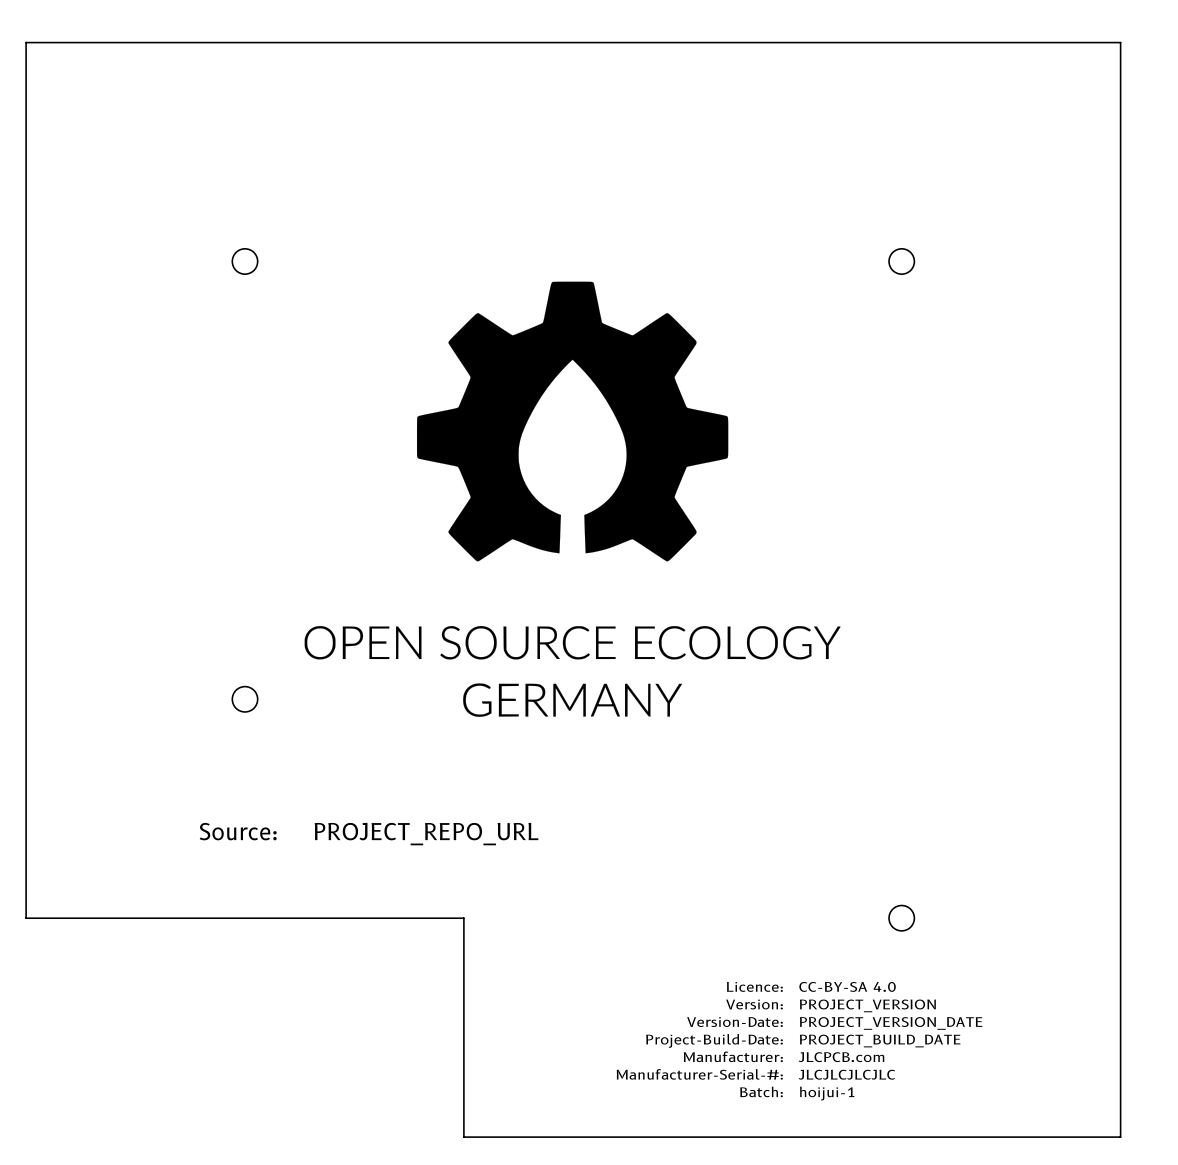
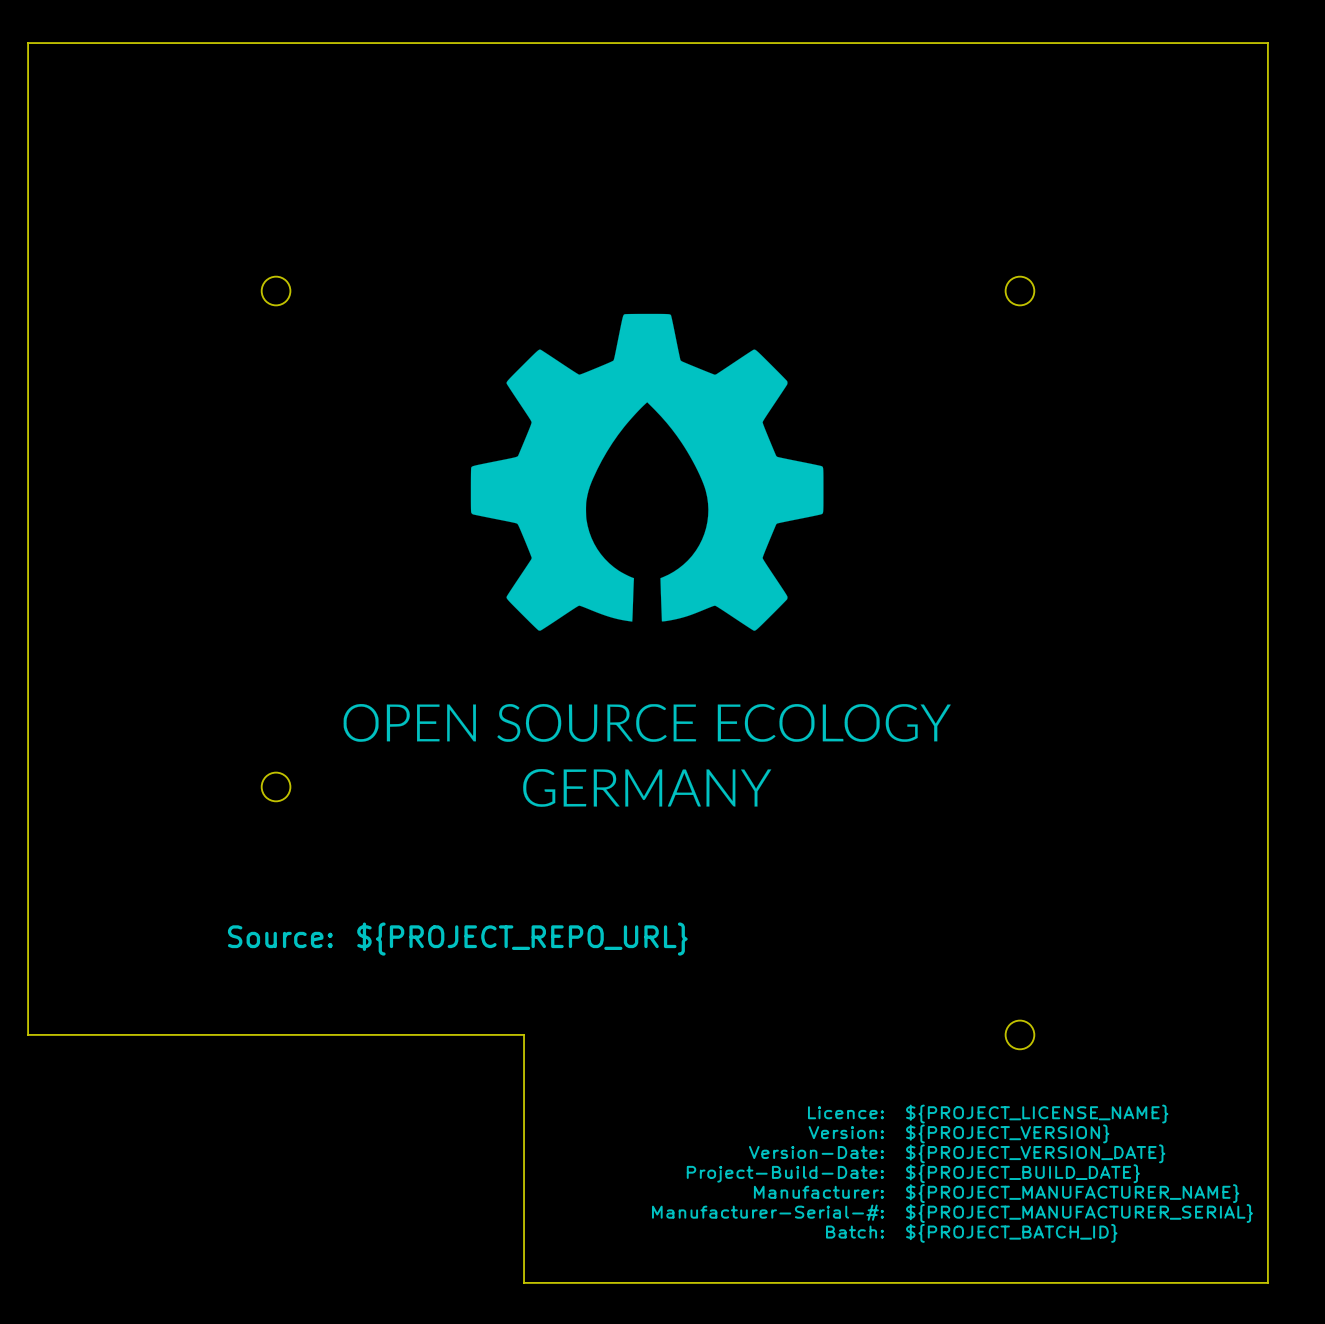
text: PROJECT_REPO_URL (426, 834) -> ${PROJECT_REPO_URL} (522, 939)
text: CC-BY-SA 4.0 (847, 986) -> ${PROJECT_LICENSE_NAME} (1037, 1114)
text: PROJECT_VERSION (867, 1005) -> ${PROJECT_VERSION} (1007, 1133)
text: PROJECT_VERSION_DATE (891, 1023) -> ${PROJECT_VERSION_DATE} (1035, 1153)
text: PROJECT_BUILD_DATE (880, 1041) -> ${PROJECT_BUILD_DATE} (1022, 1173)
text: JLCPCB.com (841, 1057) -> ${PROJECT_MANUFACTURER_NAME} (1072, 1193)
text: JLCJLCJLCJLC (846, 1074) -> ${PROJECT_MANUFACTURER_SERIAL} (1079, 1213)
text: hoijui-1 (827, 1093) -> ${PROJECT_BATCH_ID} (1011, 1233)

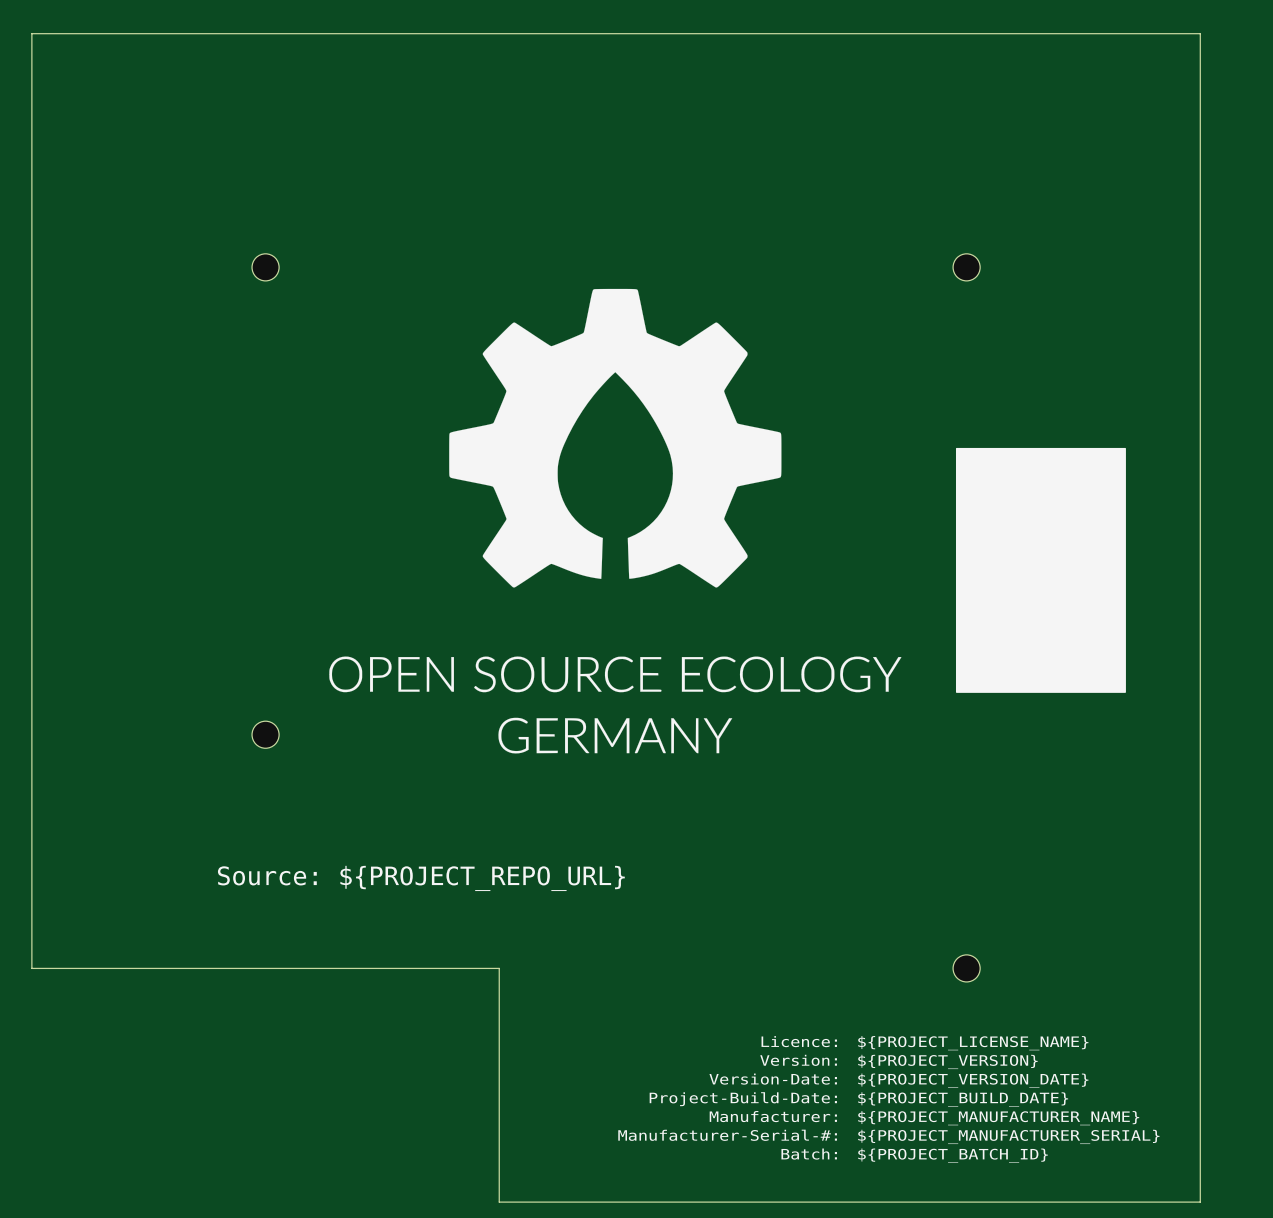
drawing: none -> [955, 447, 1126, 693]

